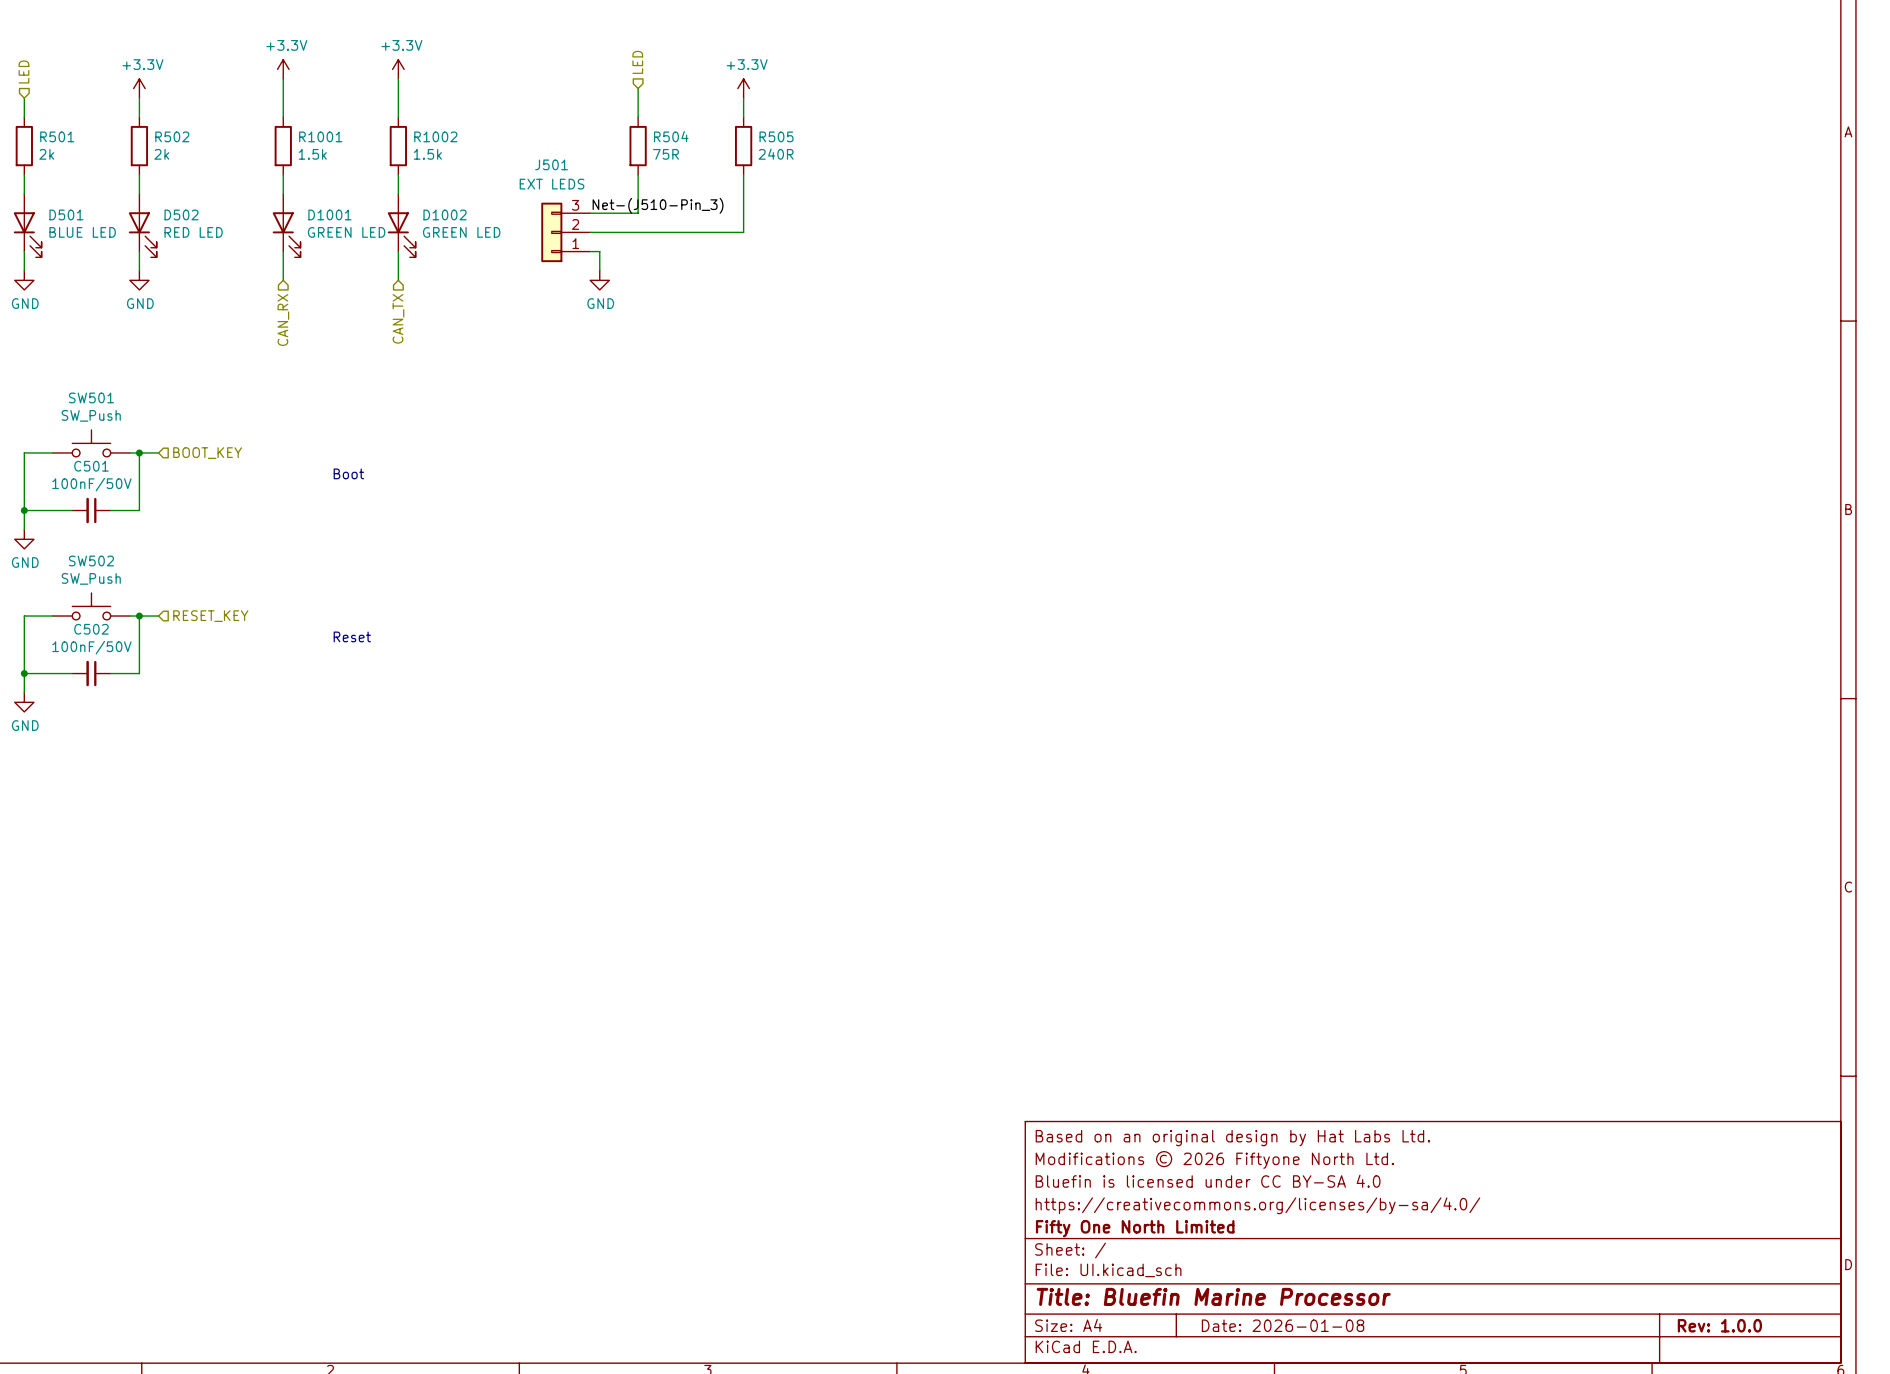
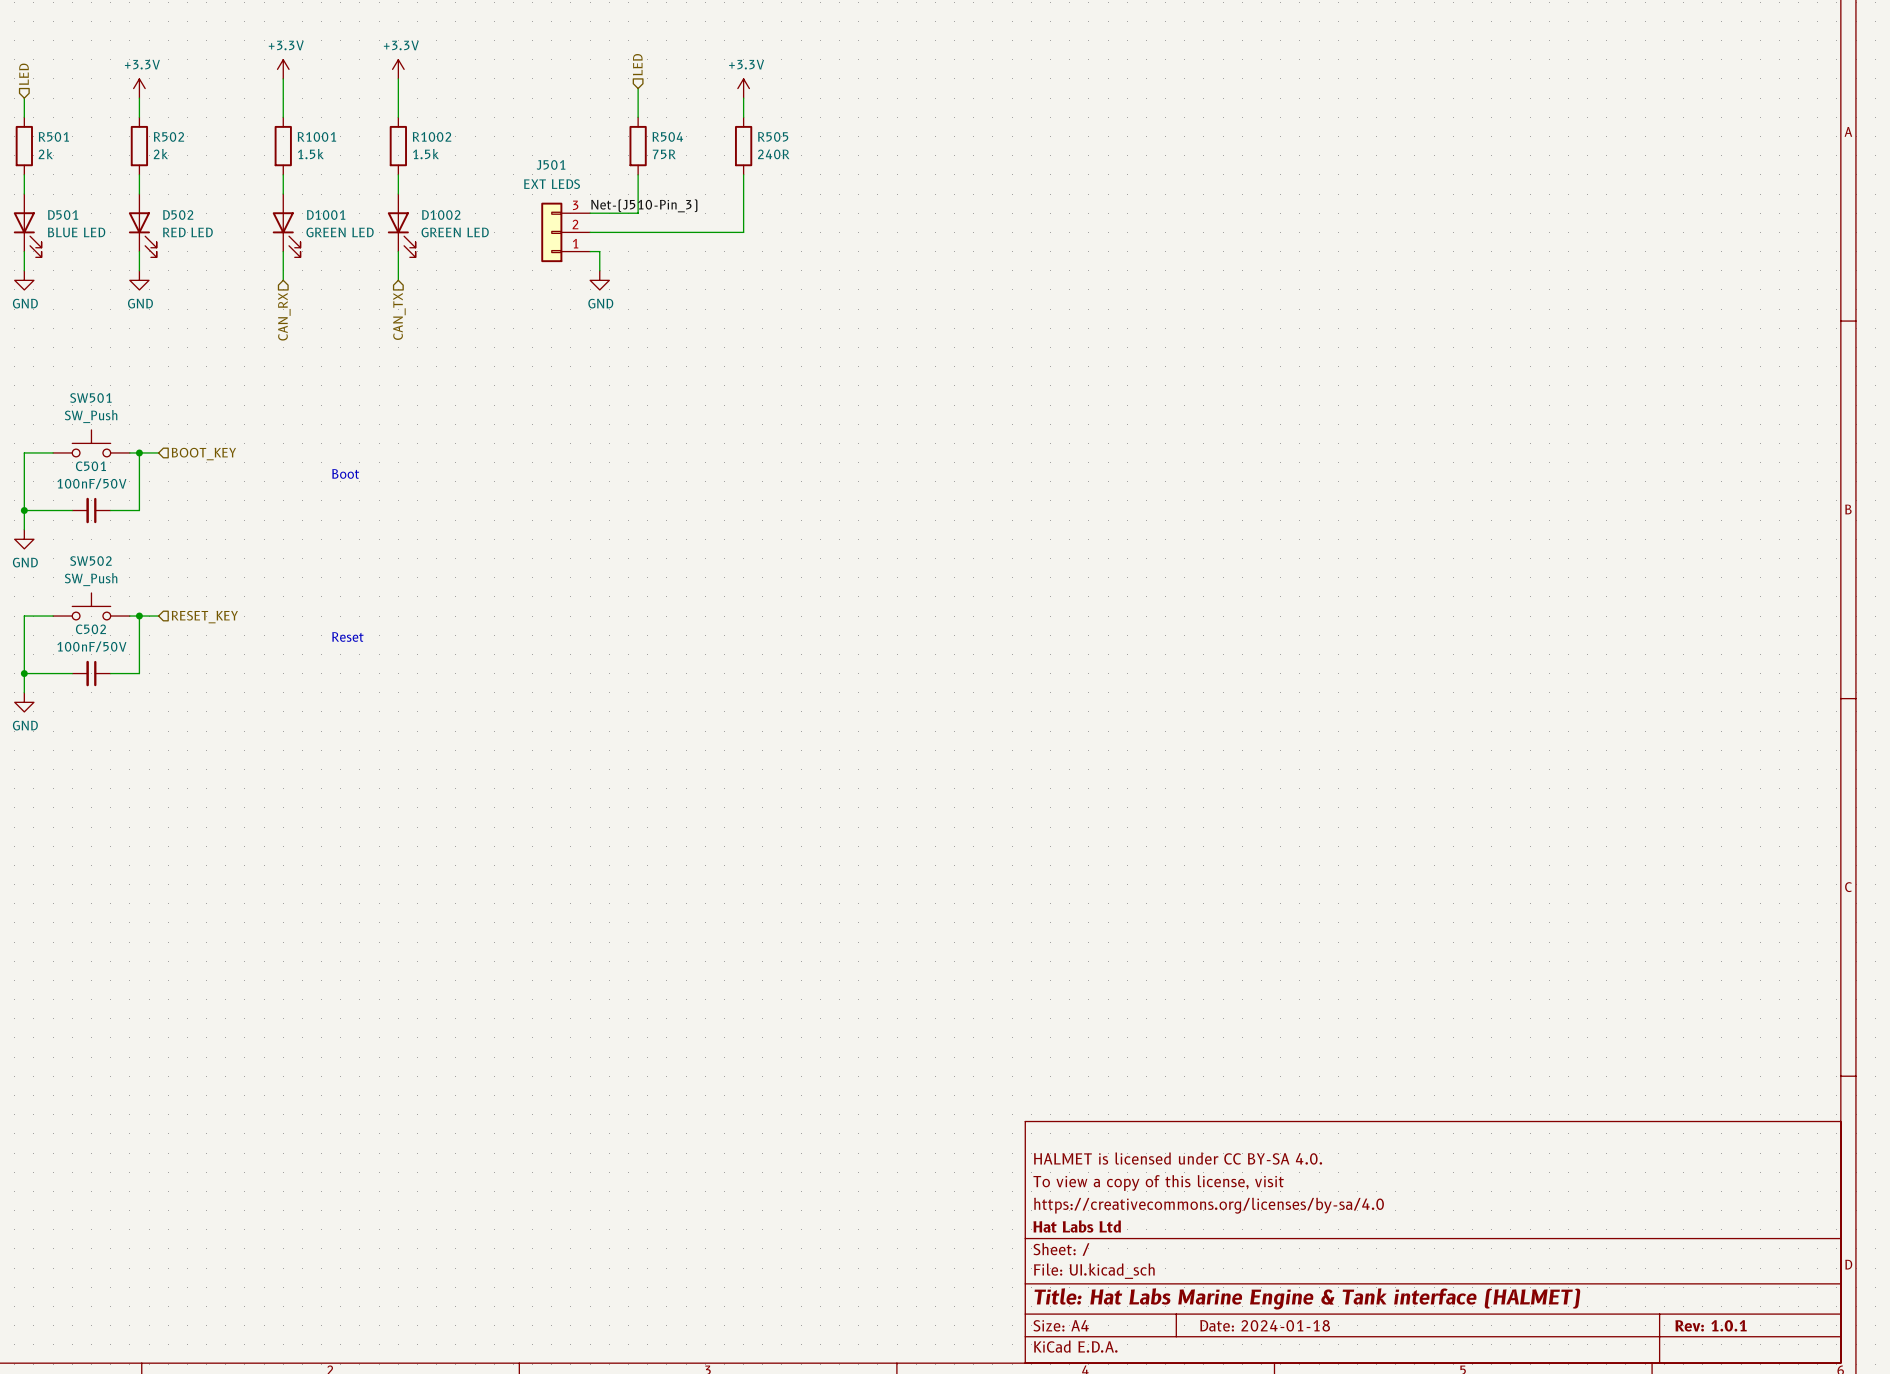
title block: Based on an original design by Hat Labs Ltd. (1232, 1138) -> none
title block: Modifications © 2026 Fiftyone North Ltd. (1214, 1159) -> HALMET is licensed under CC BY-SA 4.0. (1178, 1158)
title block: Bluefin is licensed under CC BY-SA 4.0 (1208, 1181) -> To view a copy of this license, visit (1158, 1182)
title block: https://creativecommons.org/licenses/by-sa/4.0/ (1257, 1205) -> https://creativecommons.org/licenses/by-sa/4.0 (1209, 1205)
title block: Fifty One North Limited (1135, 1228) -> Hat Labs Ltd (1077, 1226)
title block: Title: Bluefin Marine Processor (1213, 1296) -> Title: Hat Labs Marine Engine & Tank interface (HALMET) (1307, 1298)
title block: Date: 2026-01-08 (1283, 1325) -> Date: 2024-01-18 (1265, 1325)
title block: Rev: 1.0.0 (1719, 1325) -> Rev: 1.0.1 (1711, 1325)

